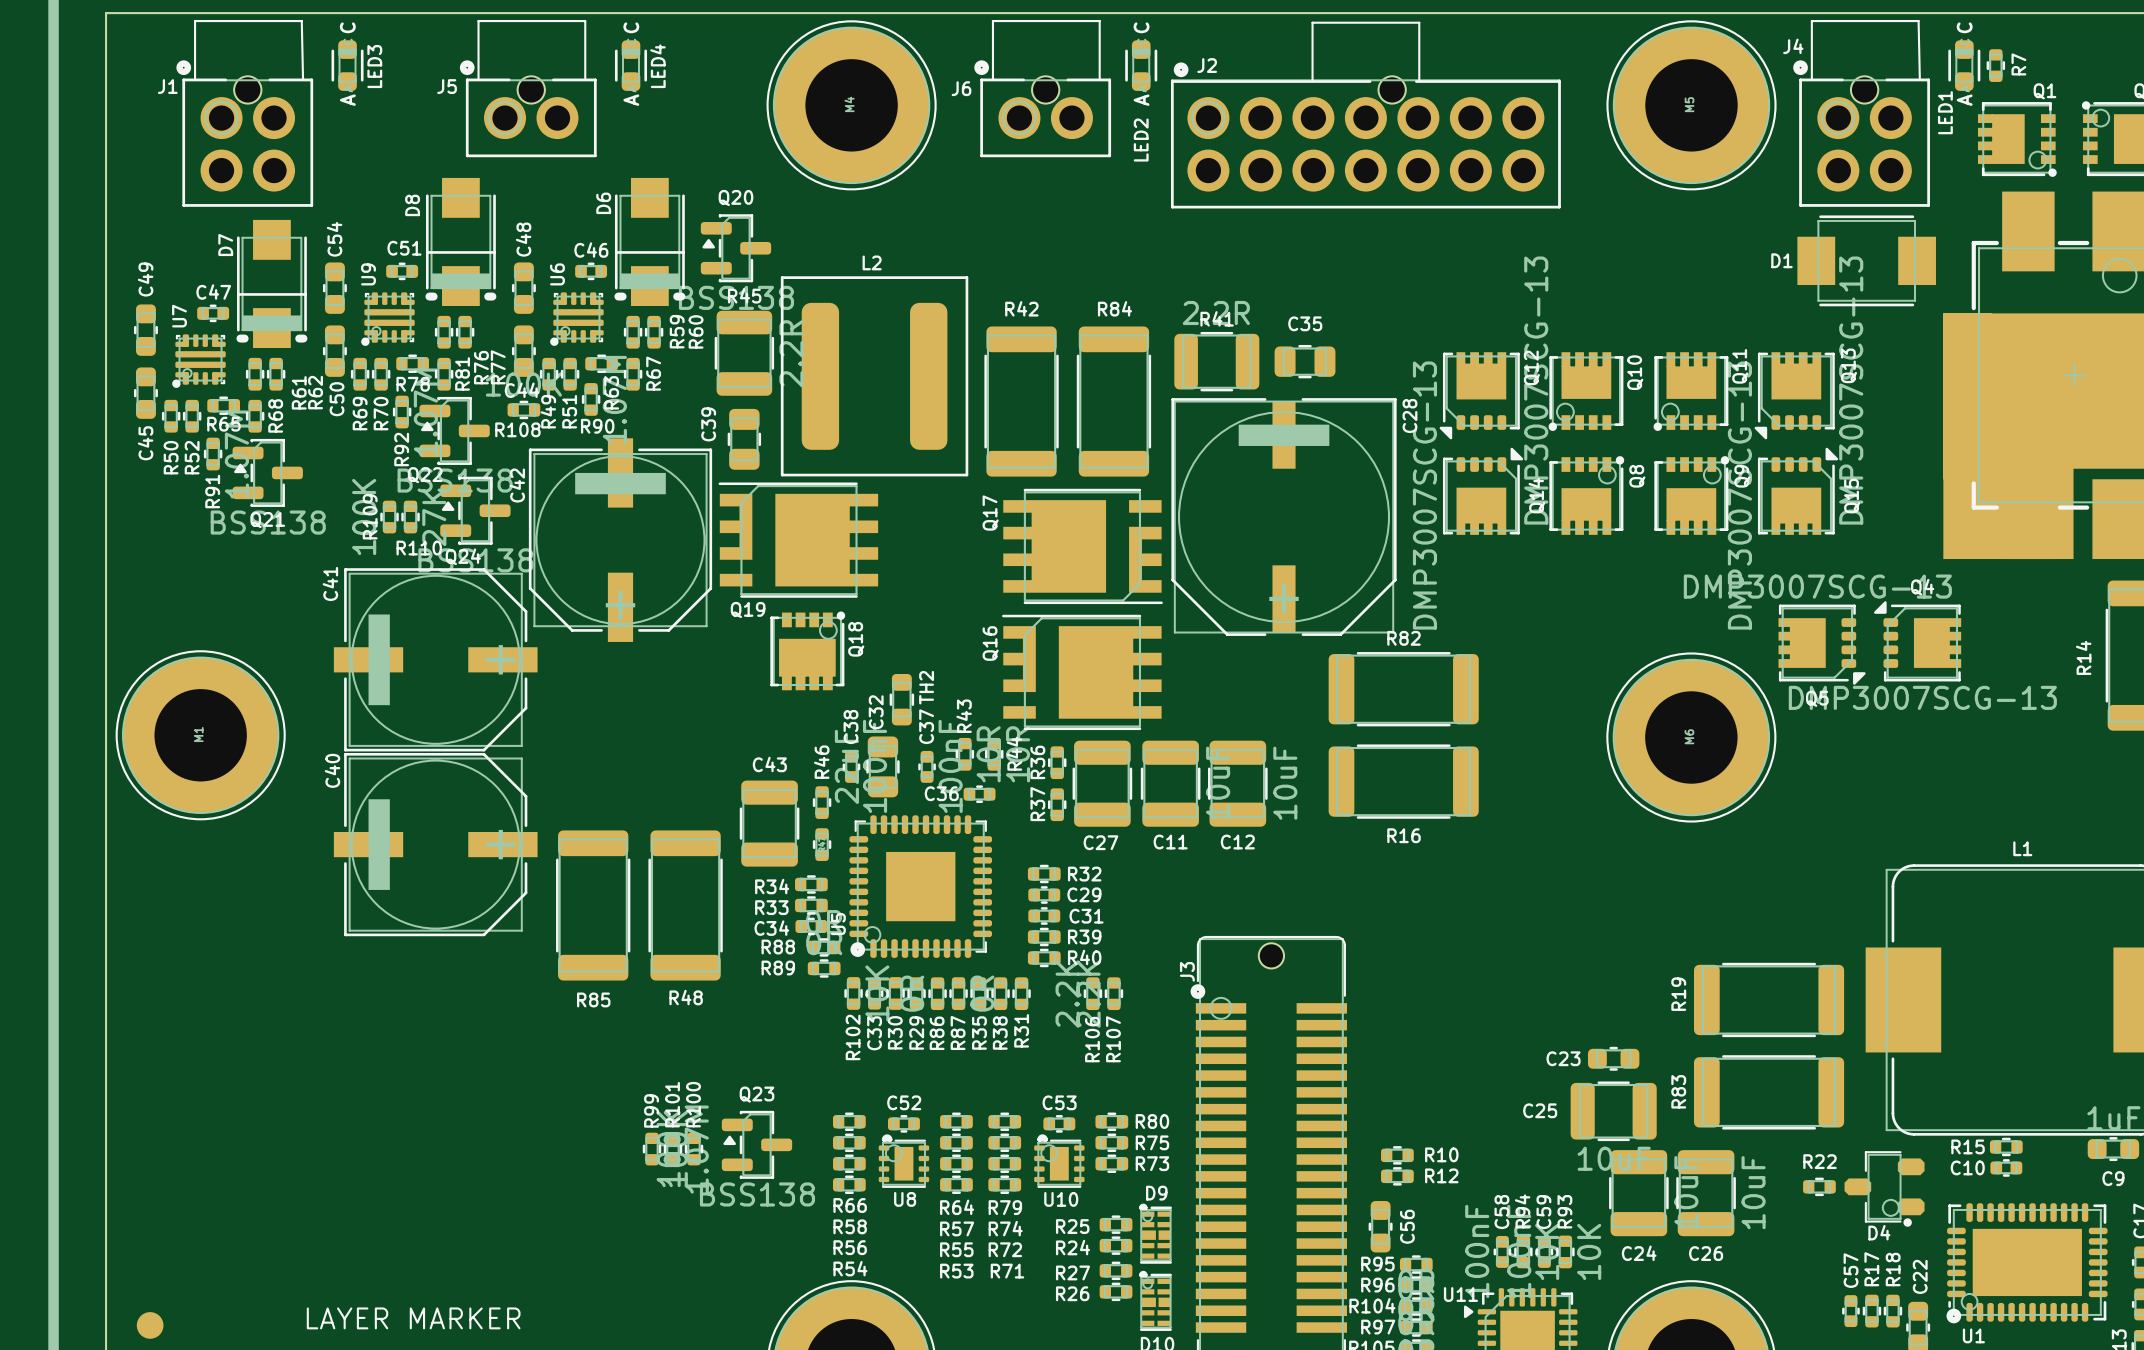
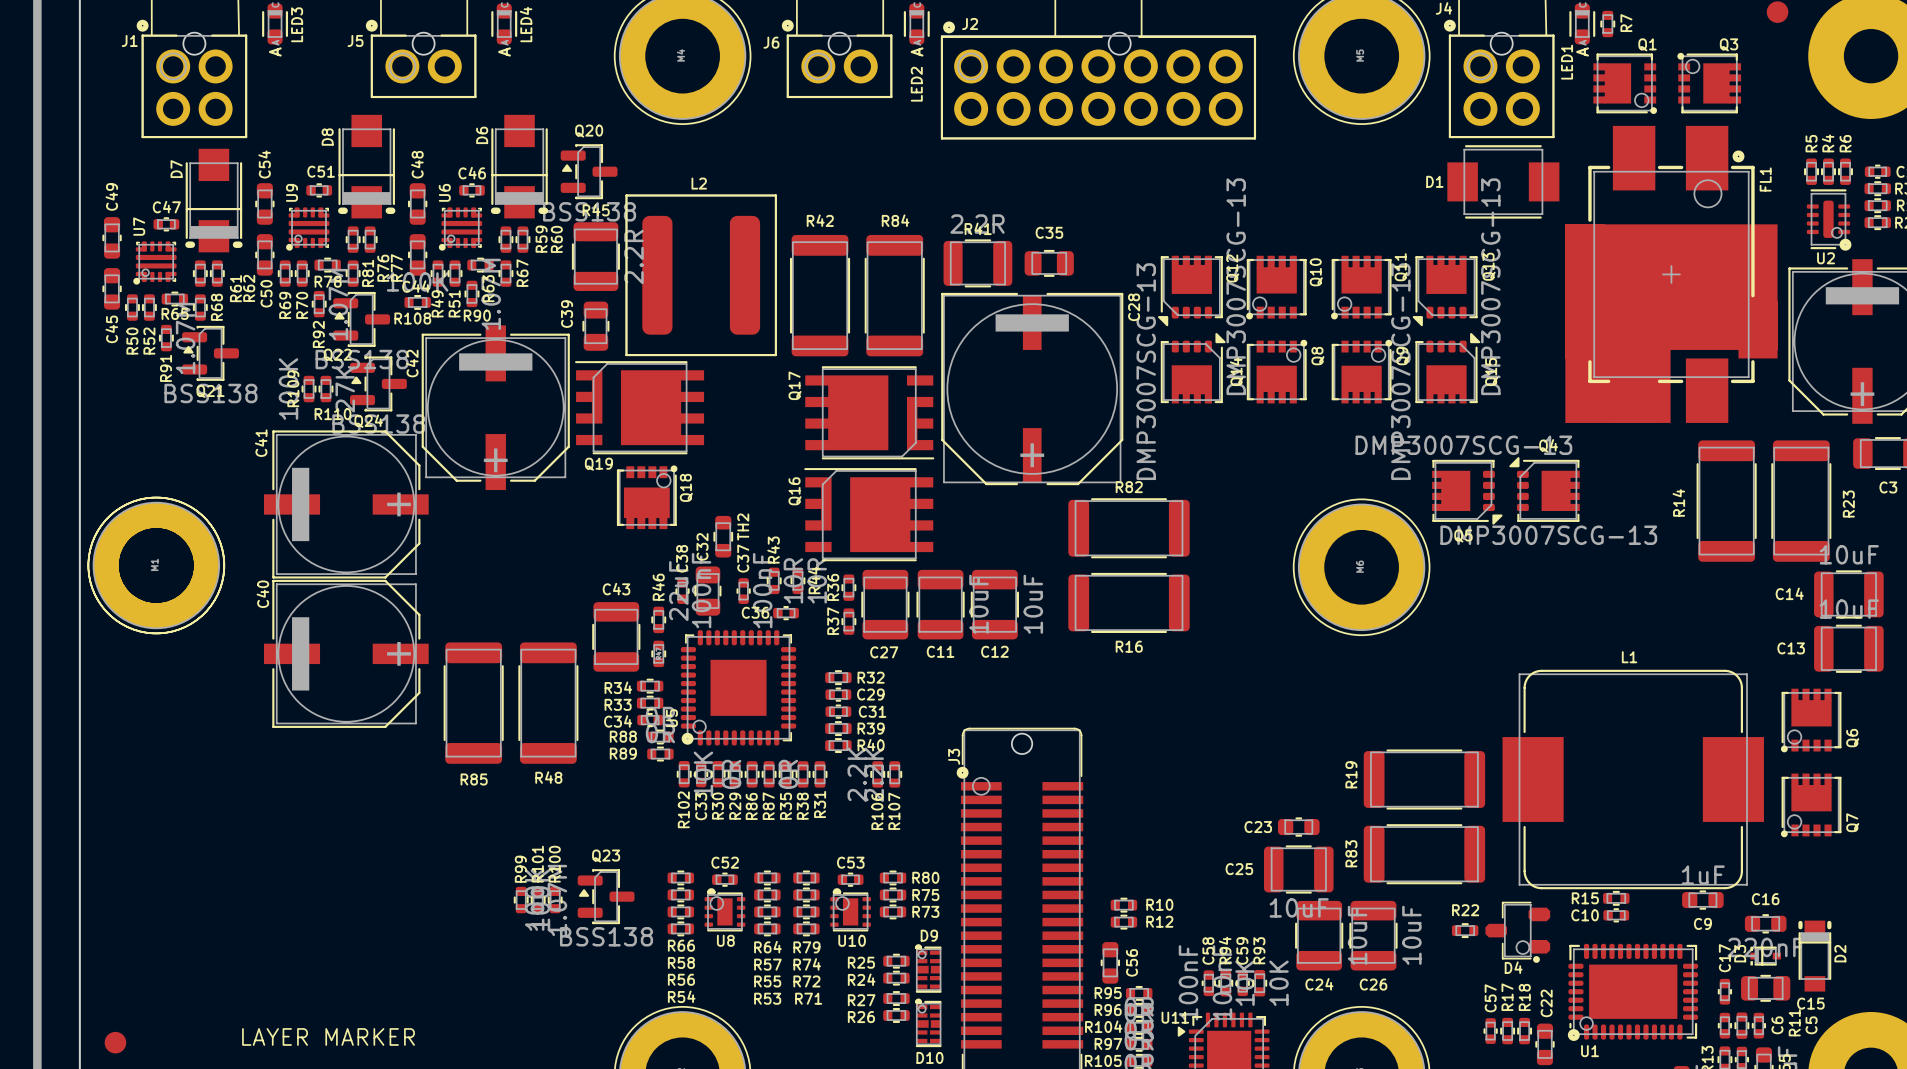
part: none -> (156, 565)

